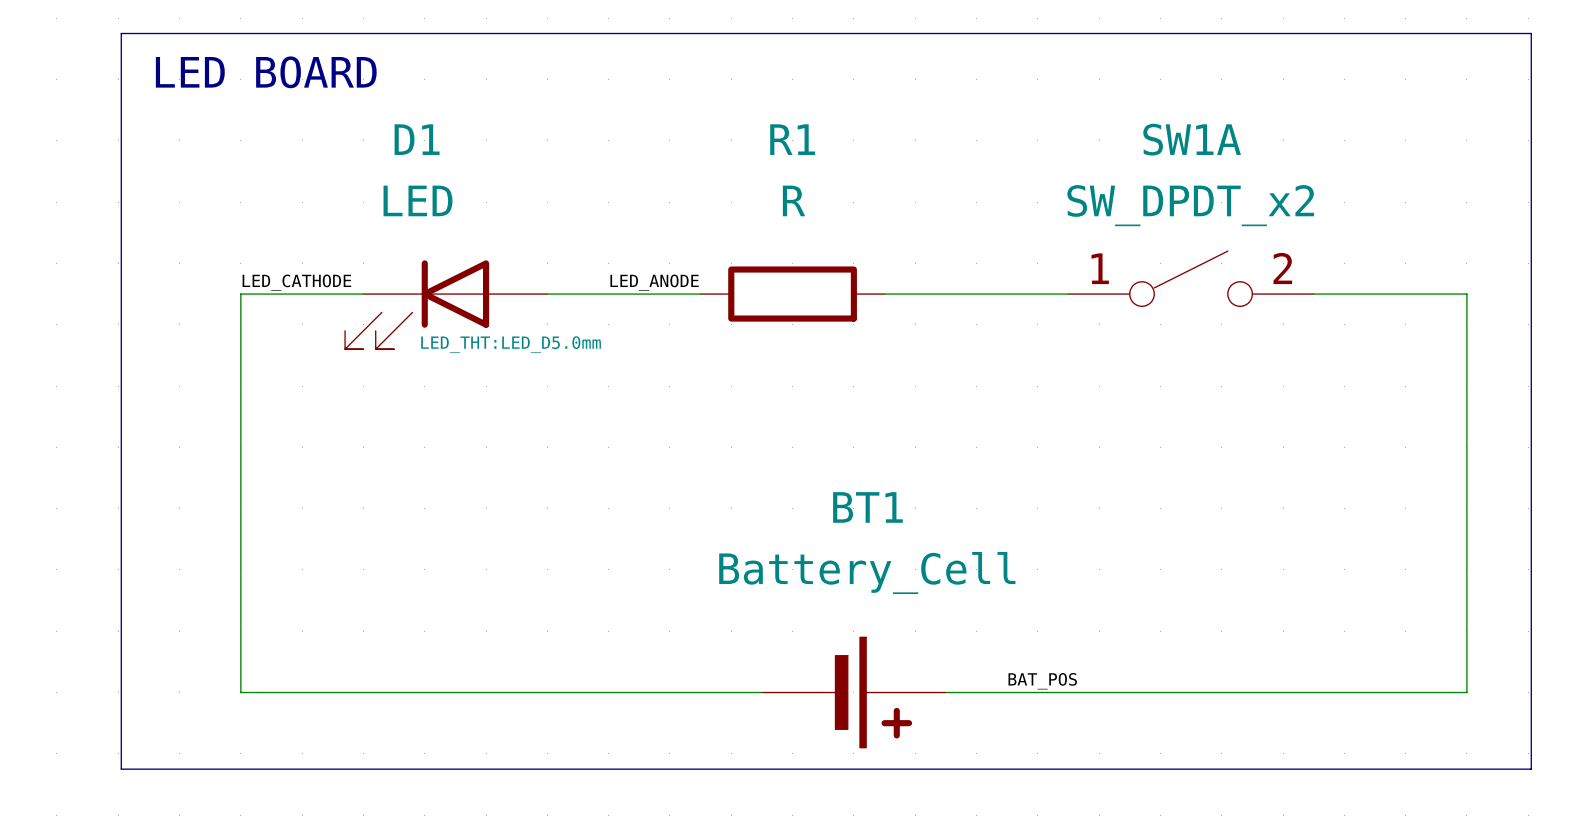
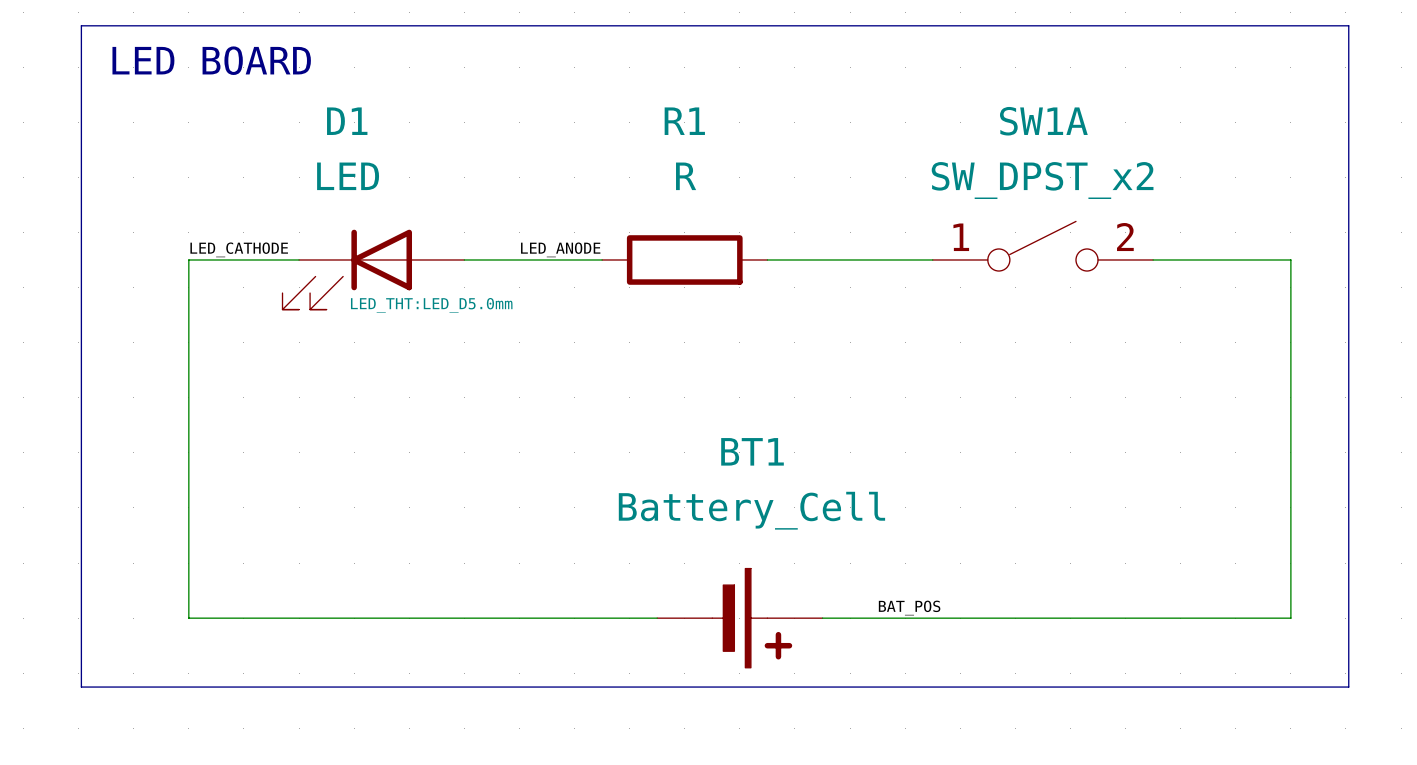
SW1A value: SW_DPDT_x2 (1190, 205) -> SW_DPST_x2 (1042, 180)

